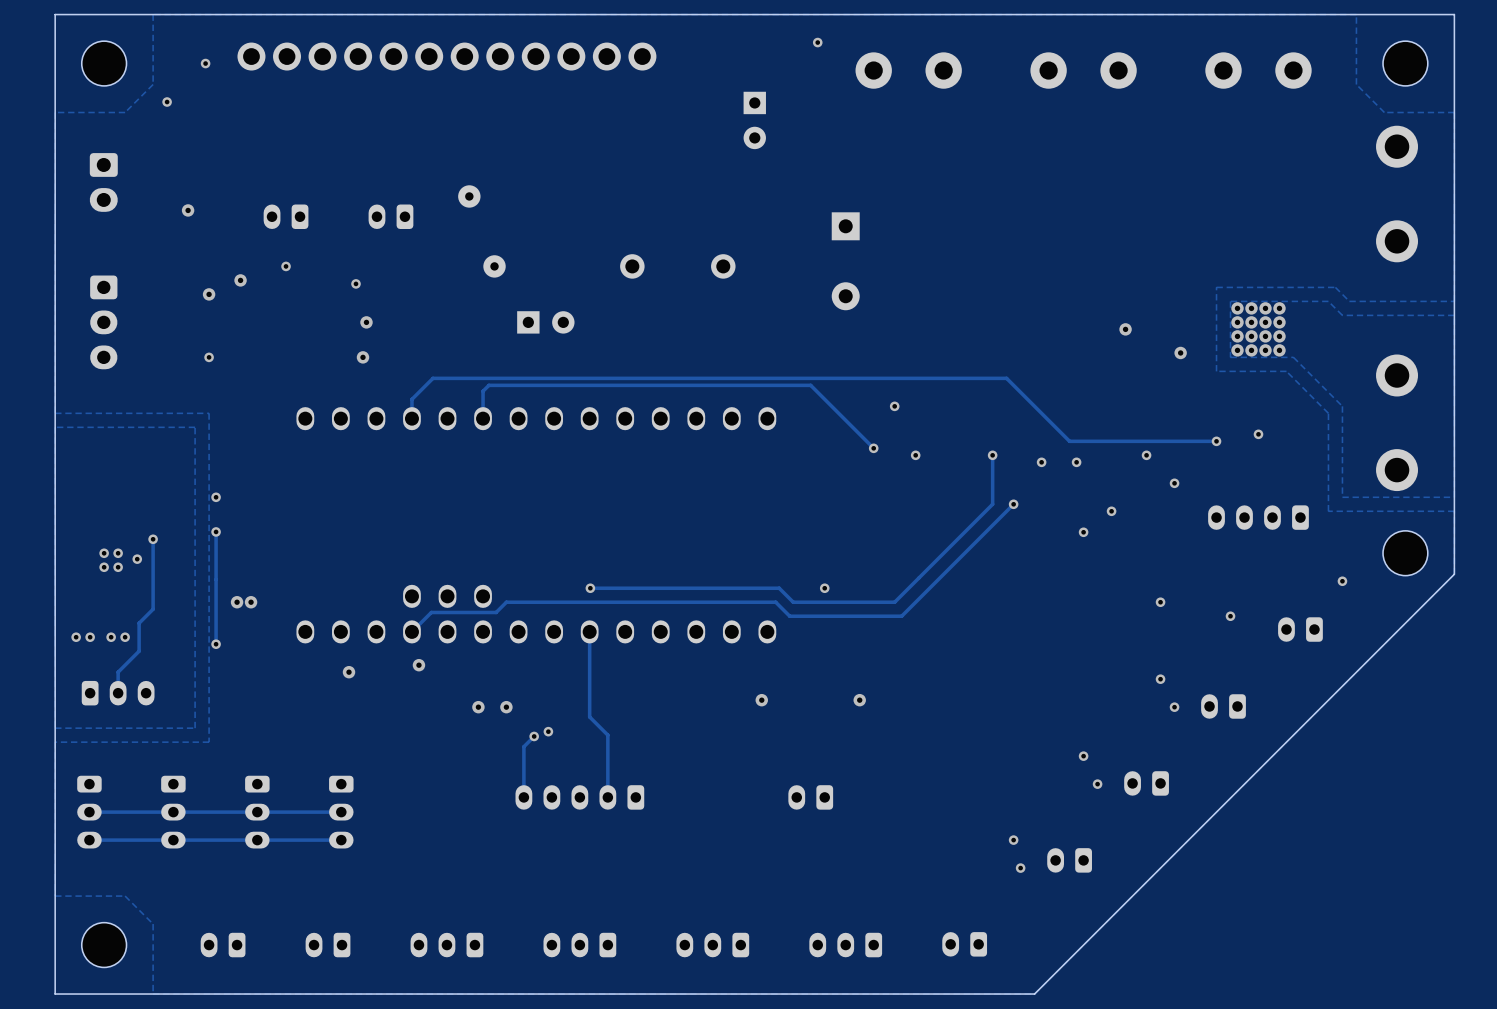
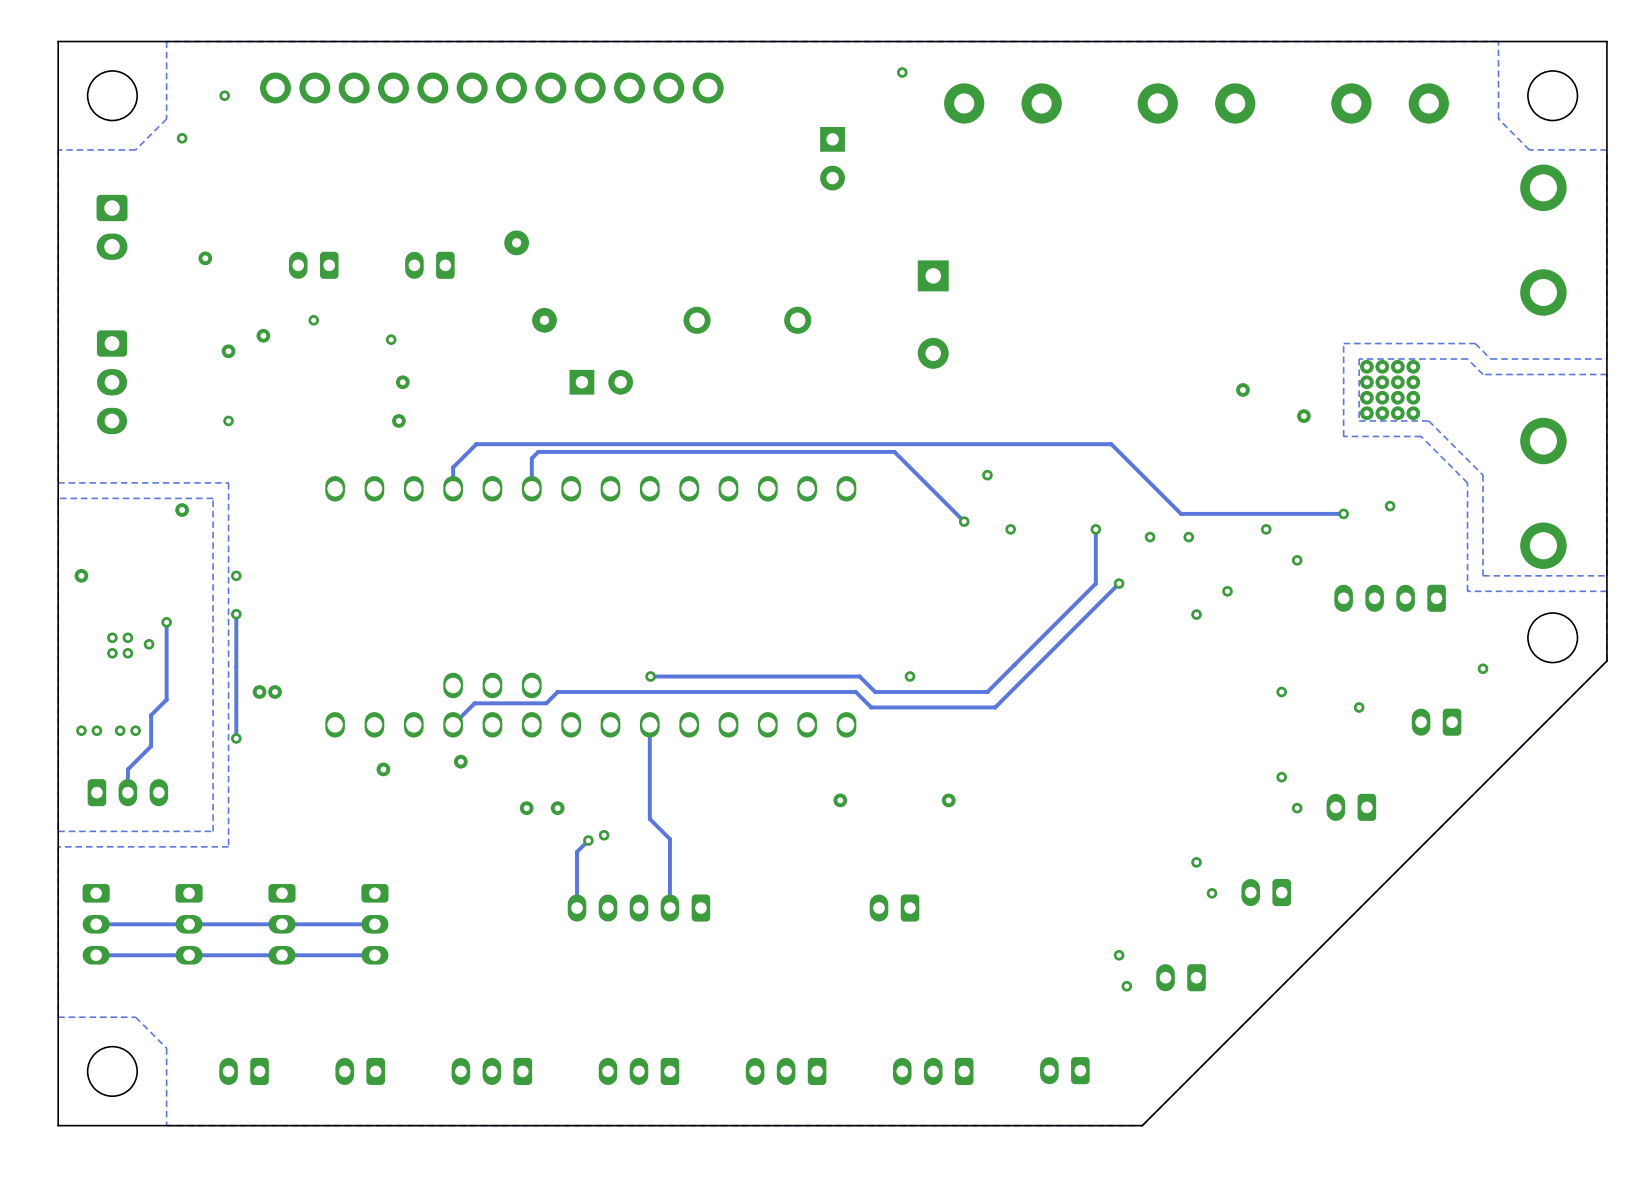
via: none -> (182, 510)
via: none -> (81, 575)

